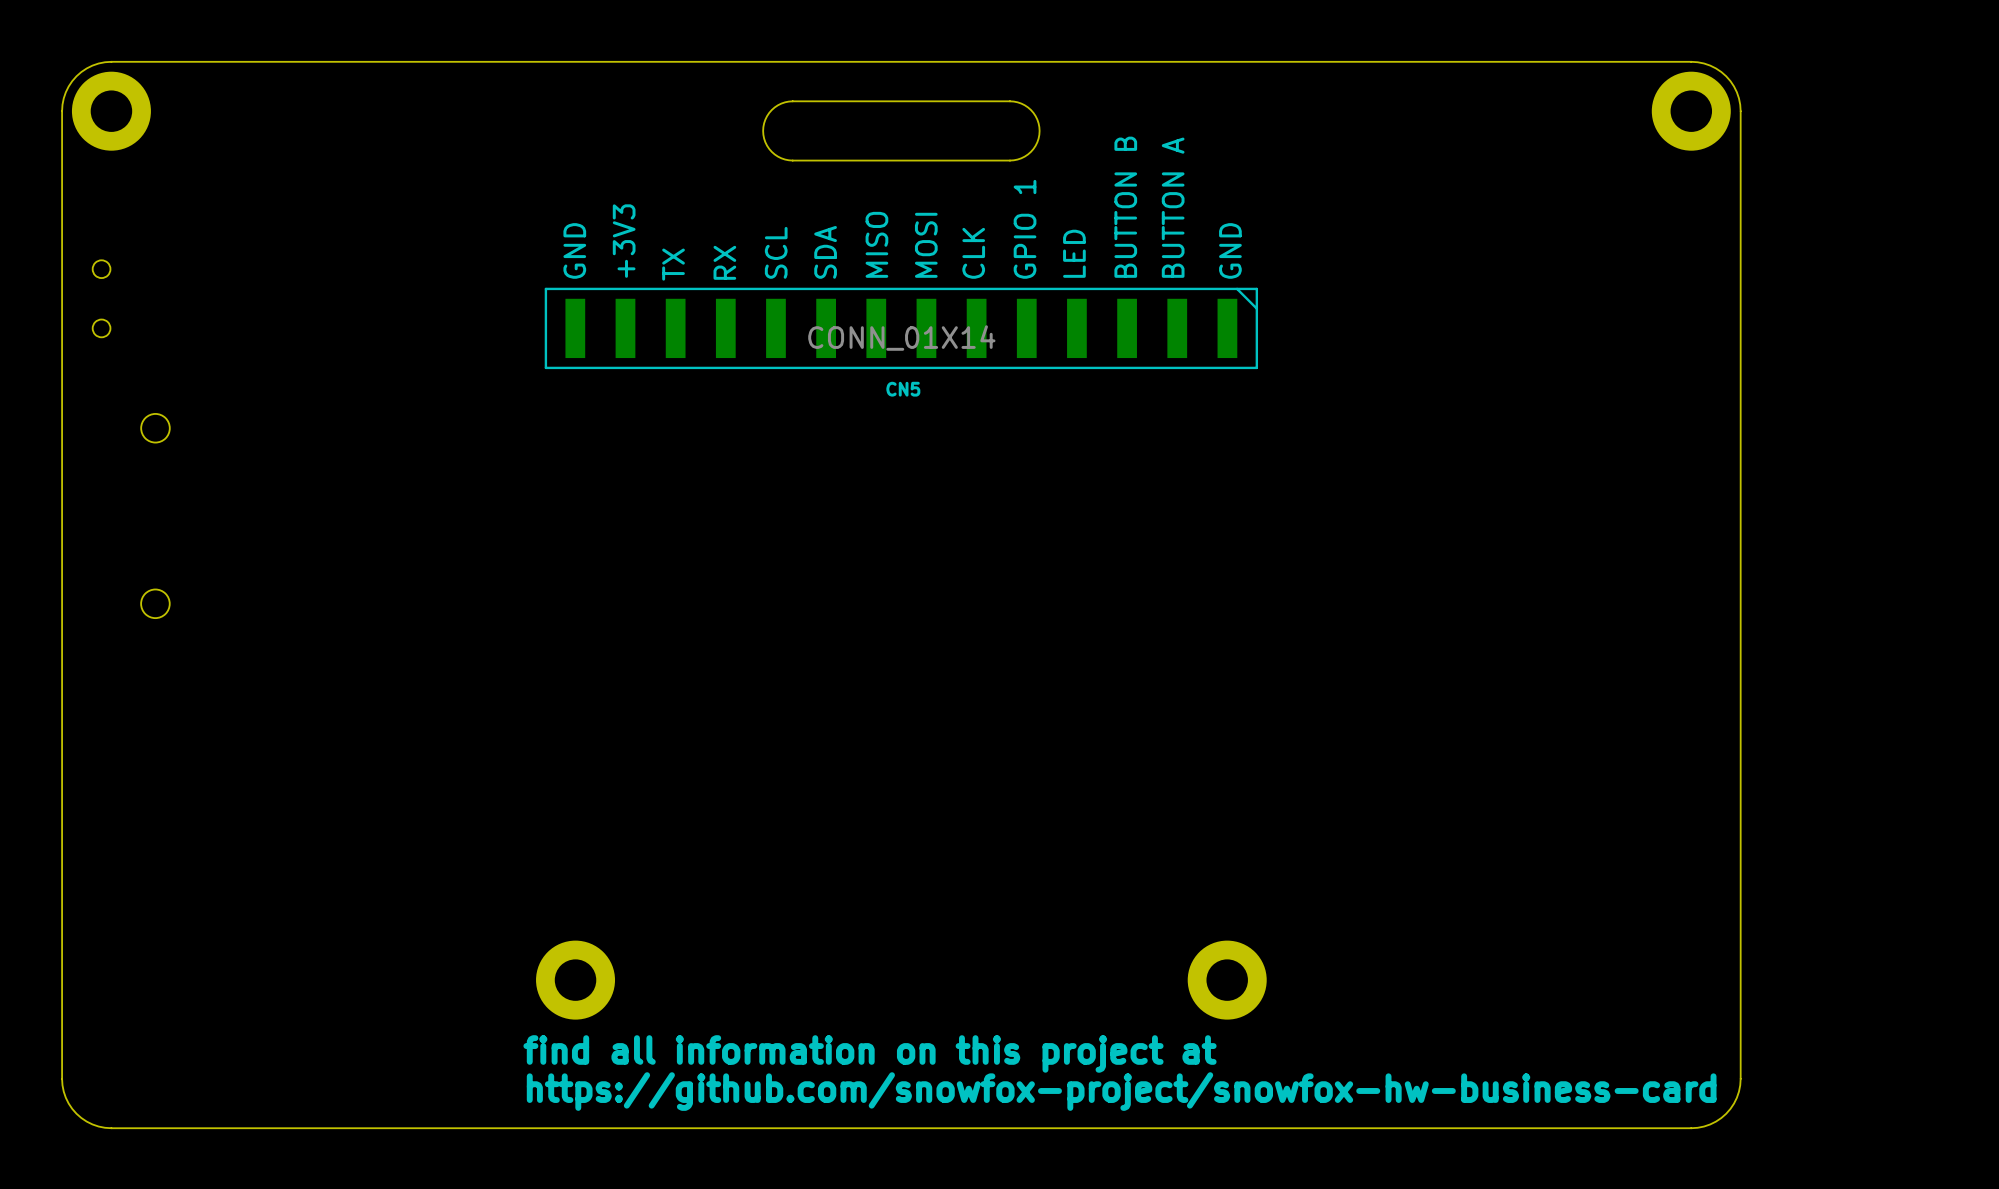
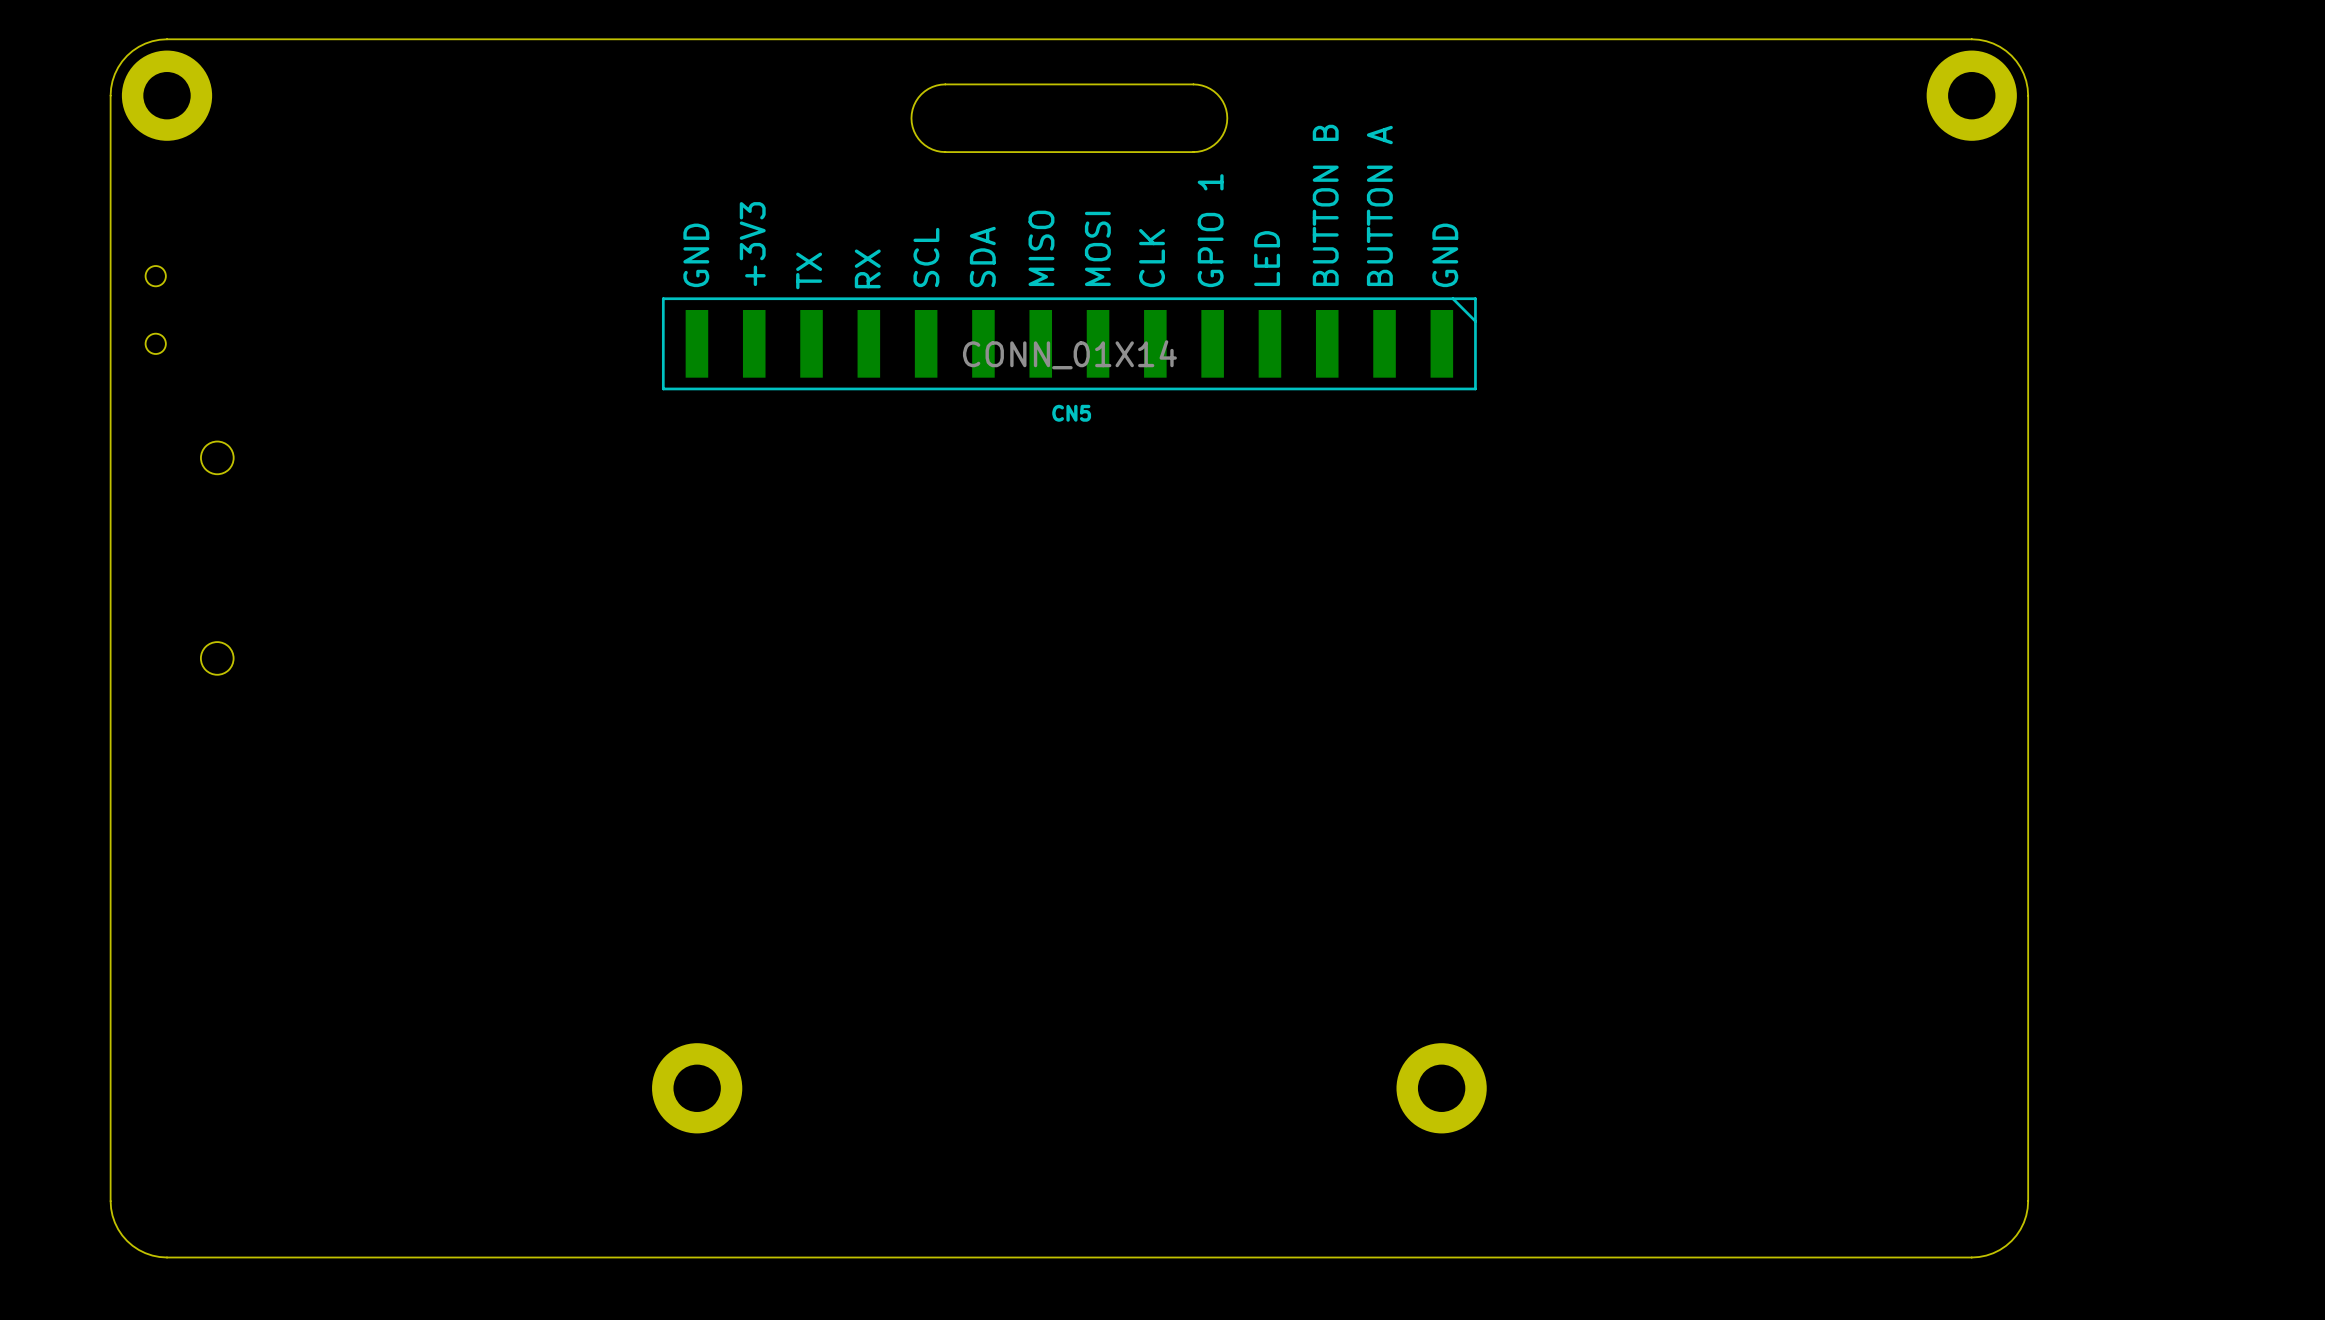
text: find all information on this project at (870, 1053) -> none
text: https://github.com/snowfox-project/snowfox-hw-business-card (1121, 1091) -> none

